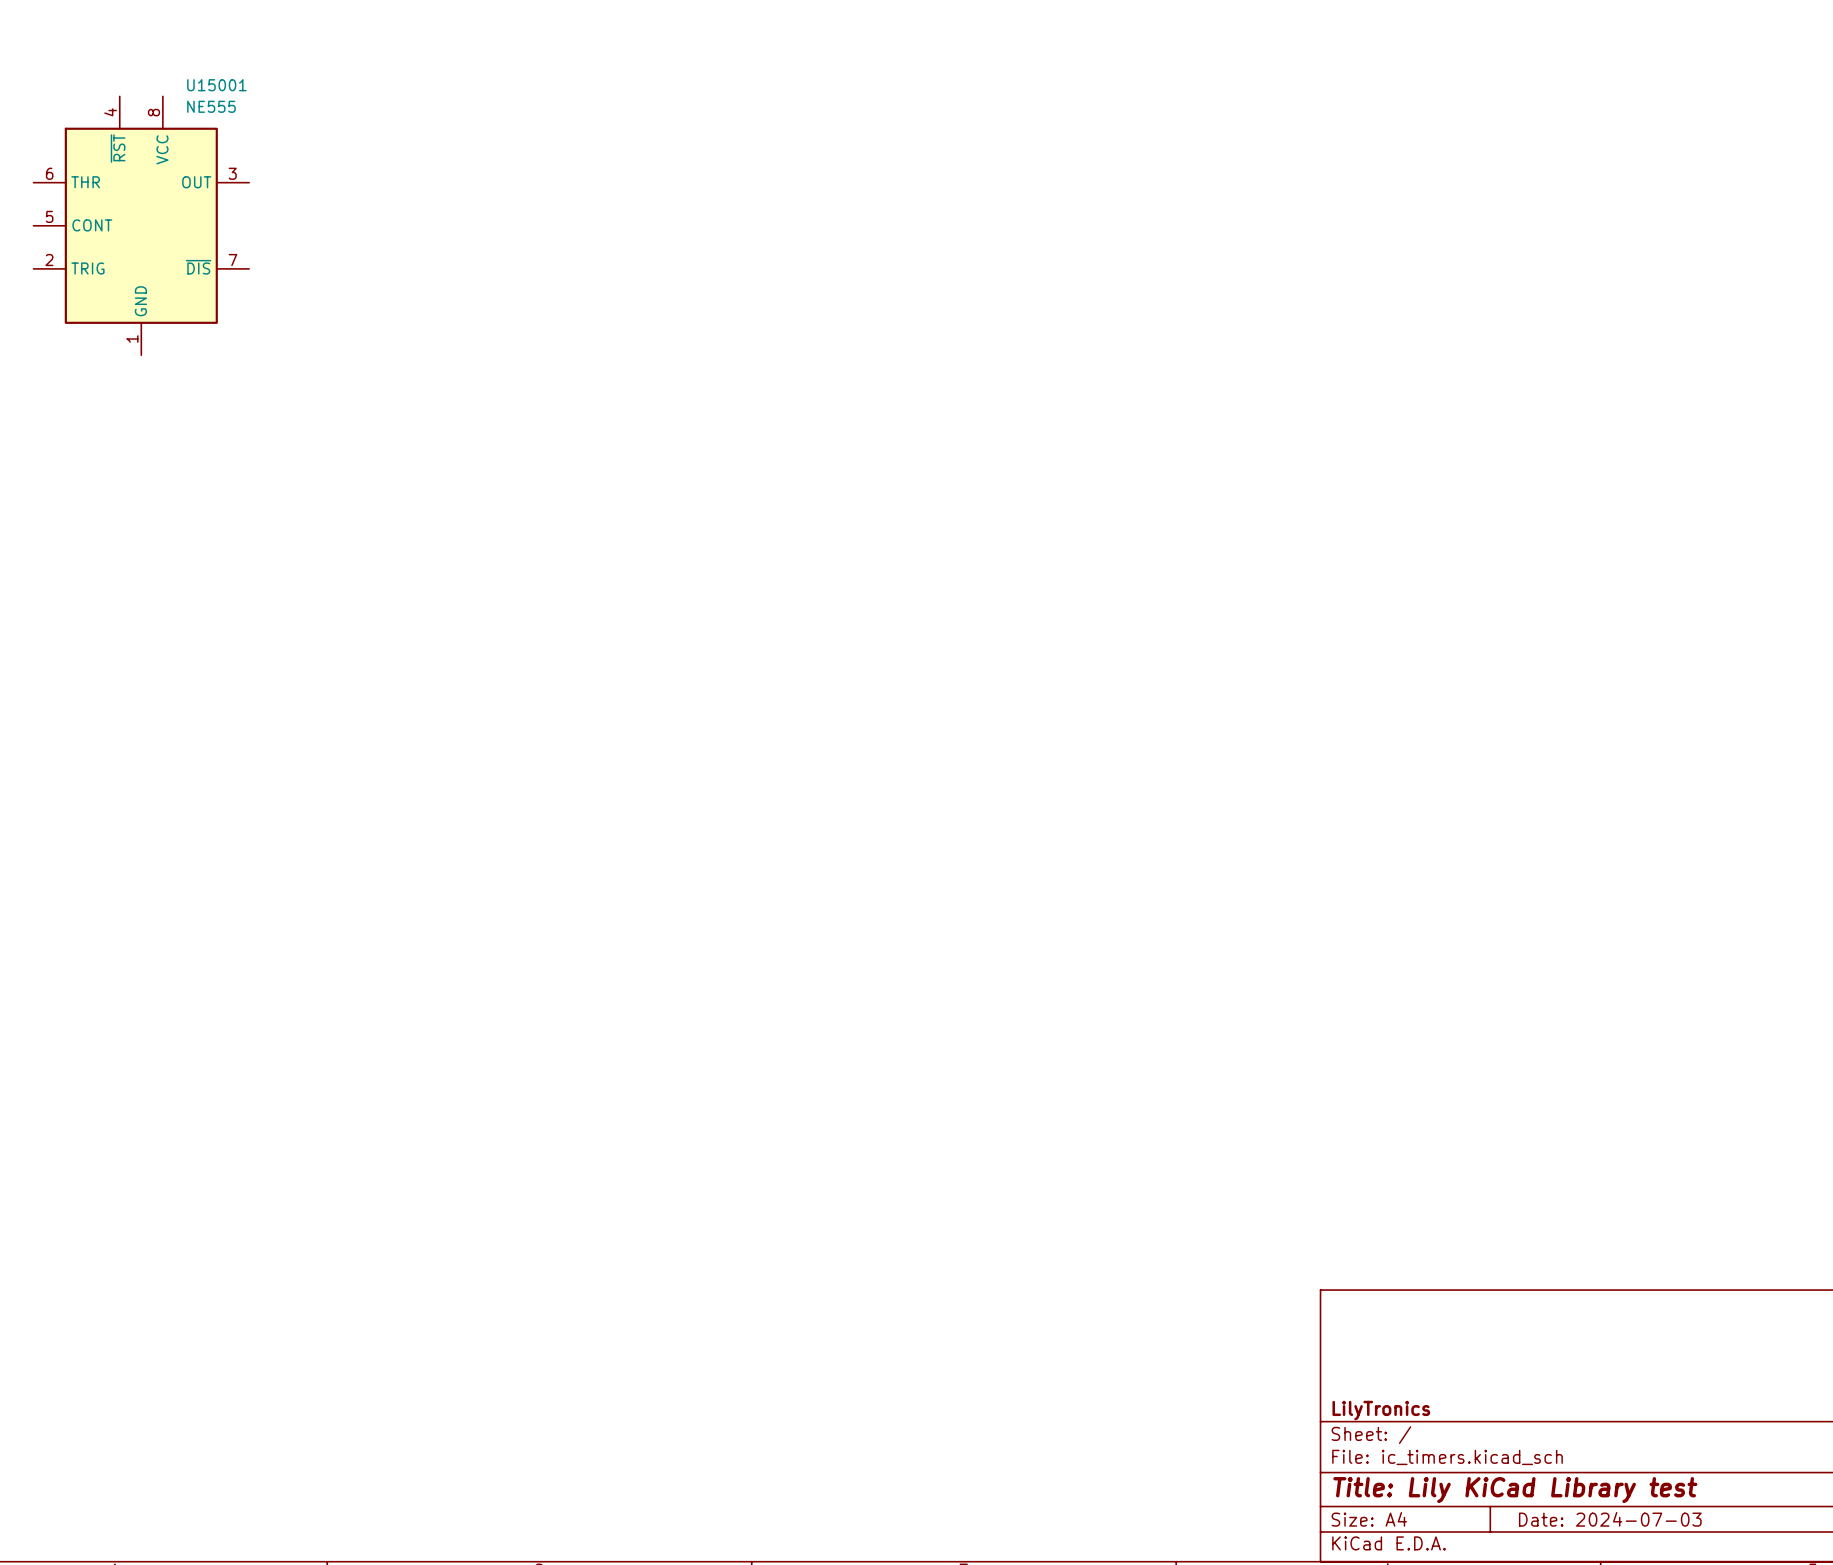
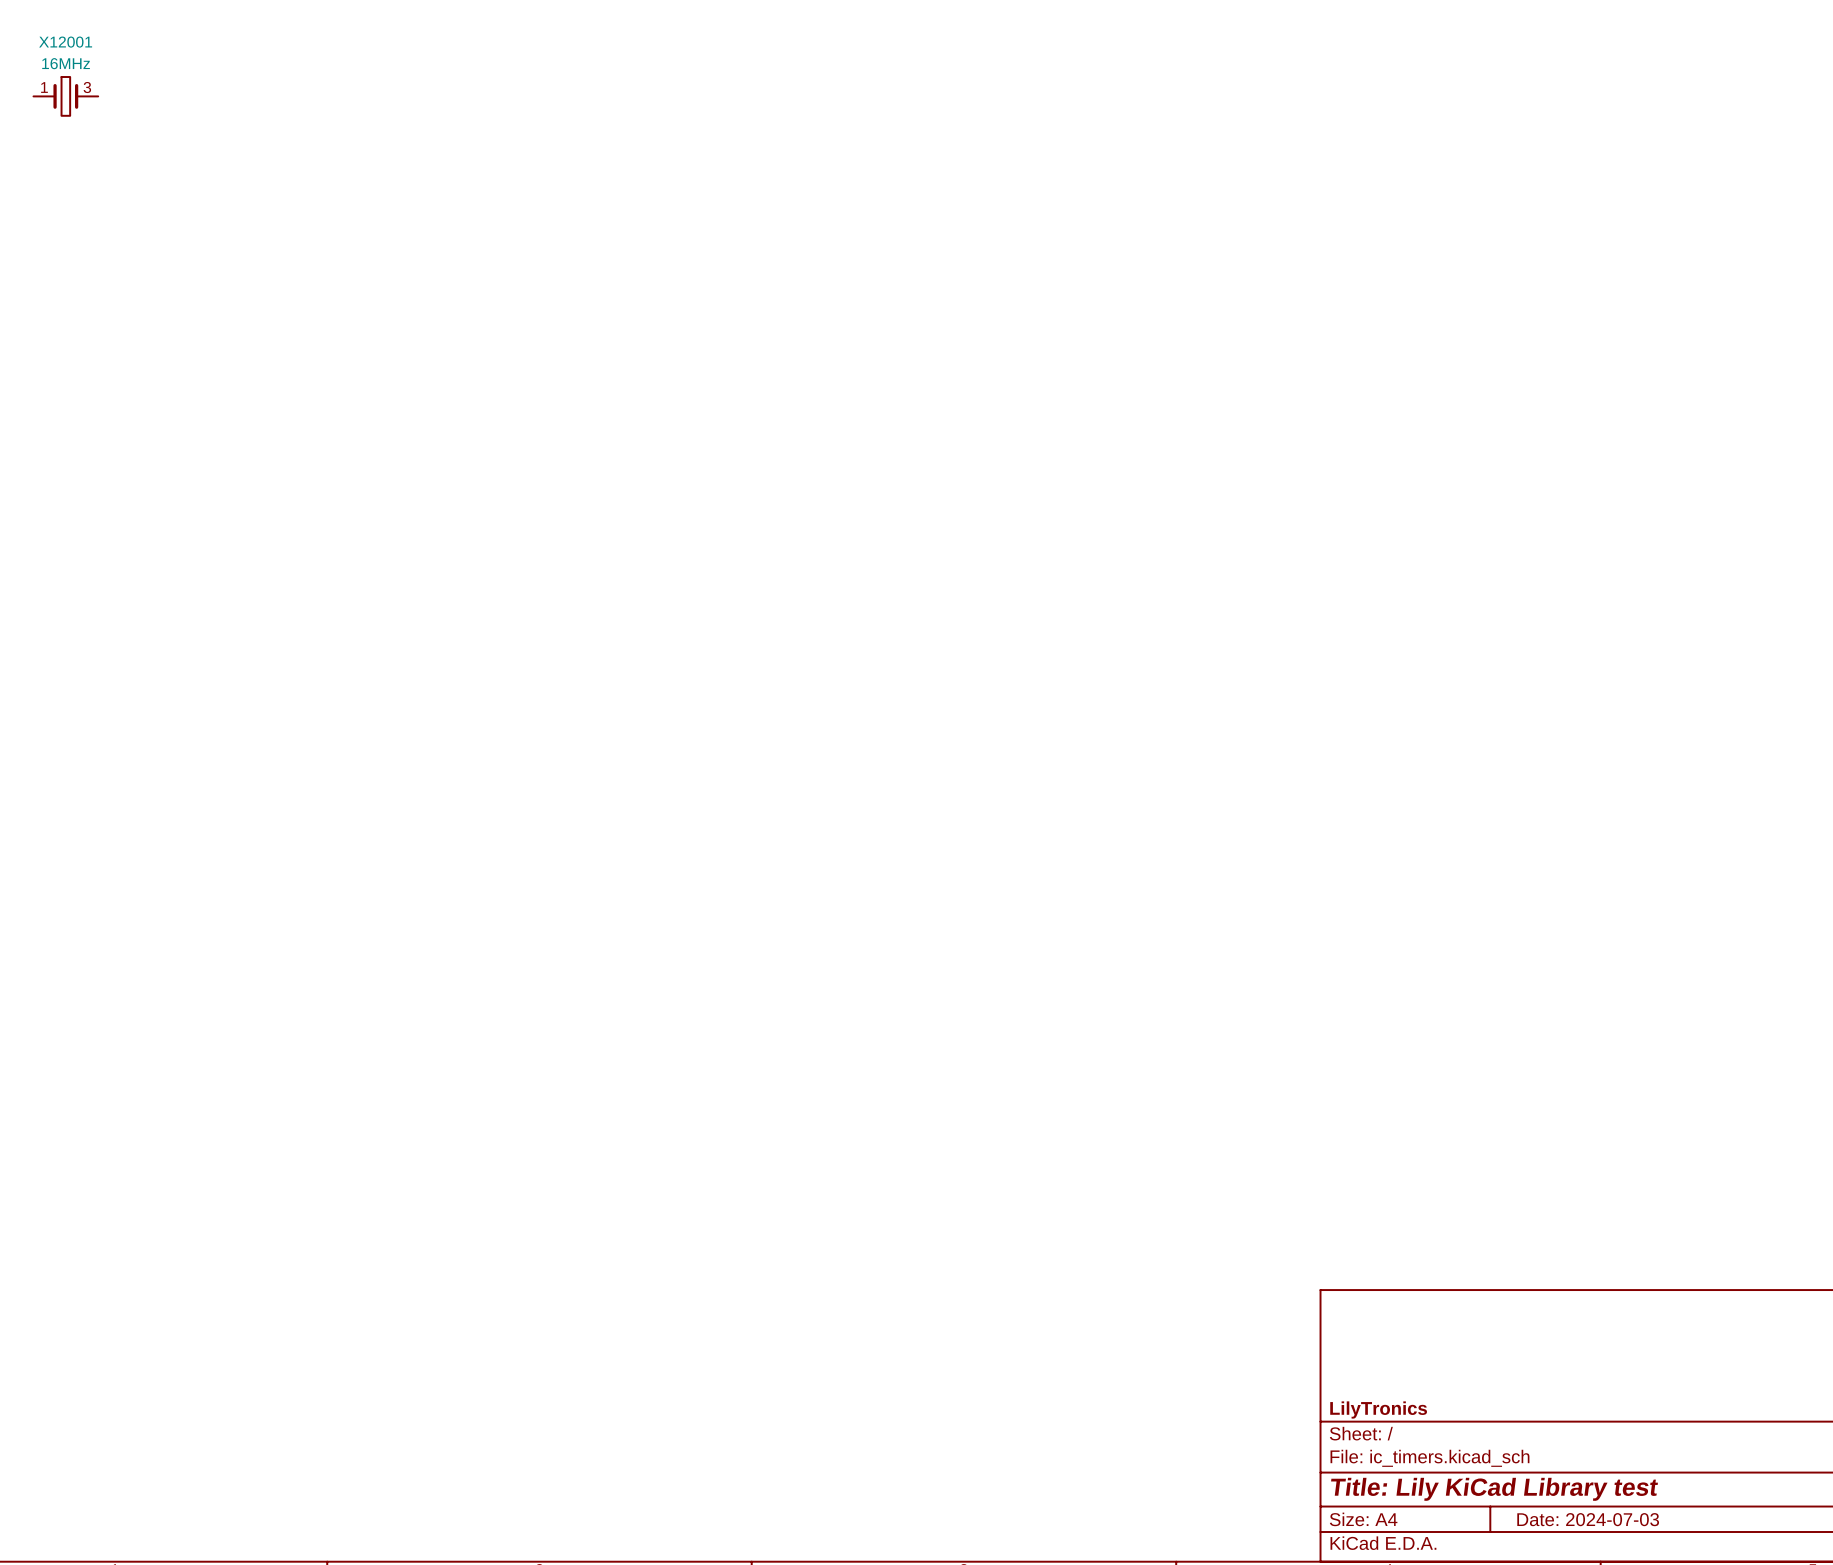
X12001: none -> 16MHz (65, 96)
U15001: NE555 (141, 225) -> none

